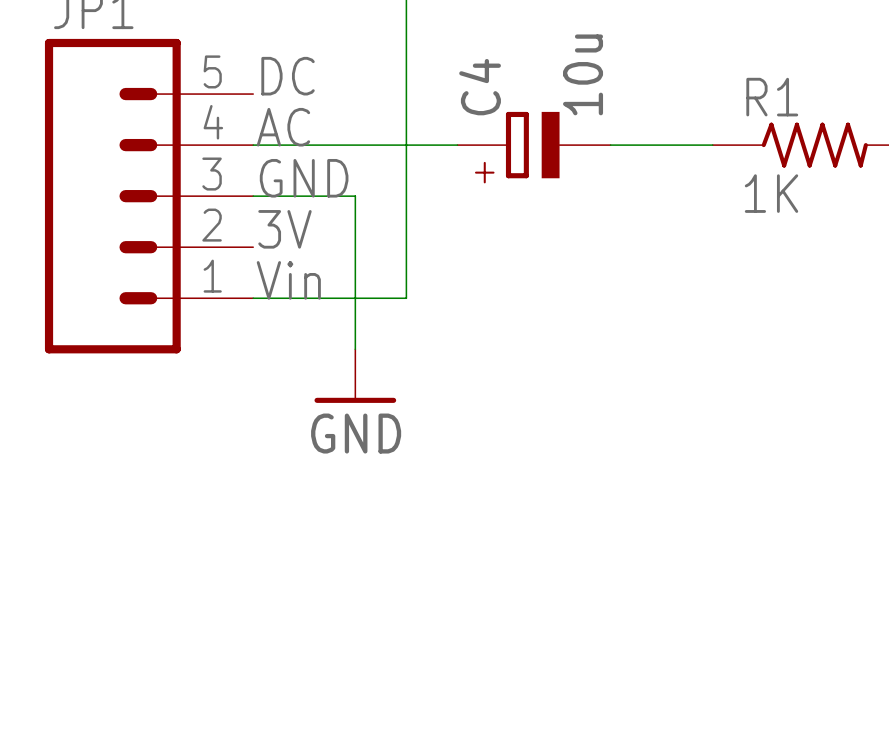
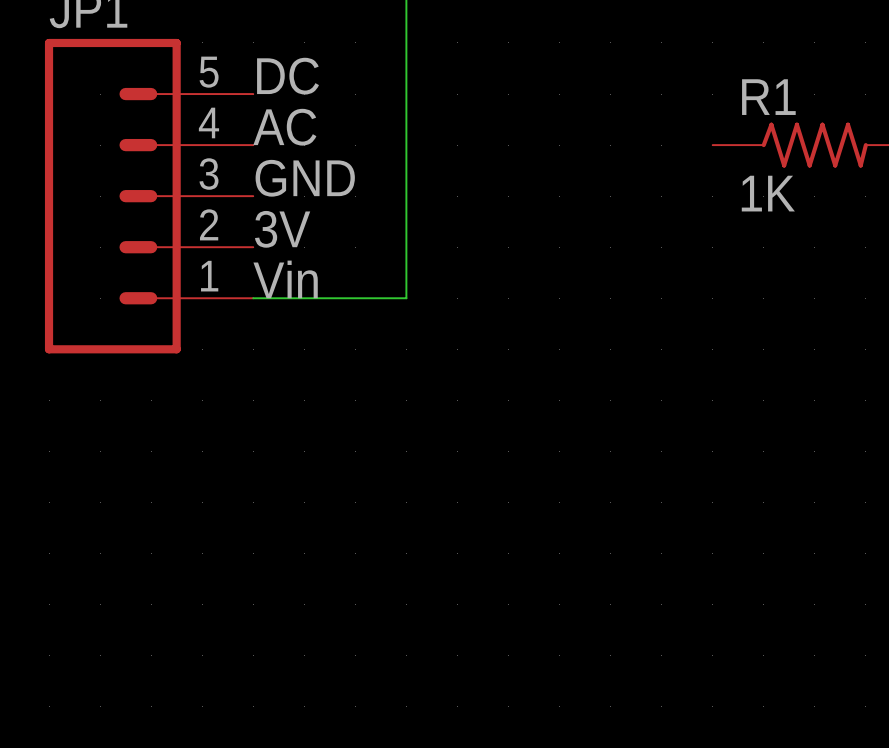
wire: (253, 145) (457, 145) -> none
C4: 10u (534, 145) -> none
wire: (610, 145) (712, 145) -> none
wire: (253, 196) (355, 196) (355, 349) -> none
power symbol: GND (355, 376) -> none

